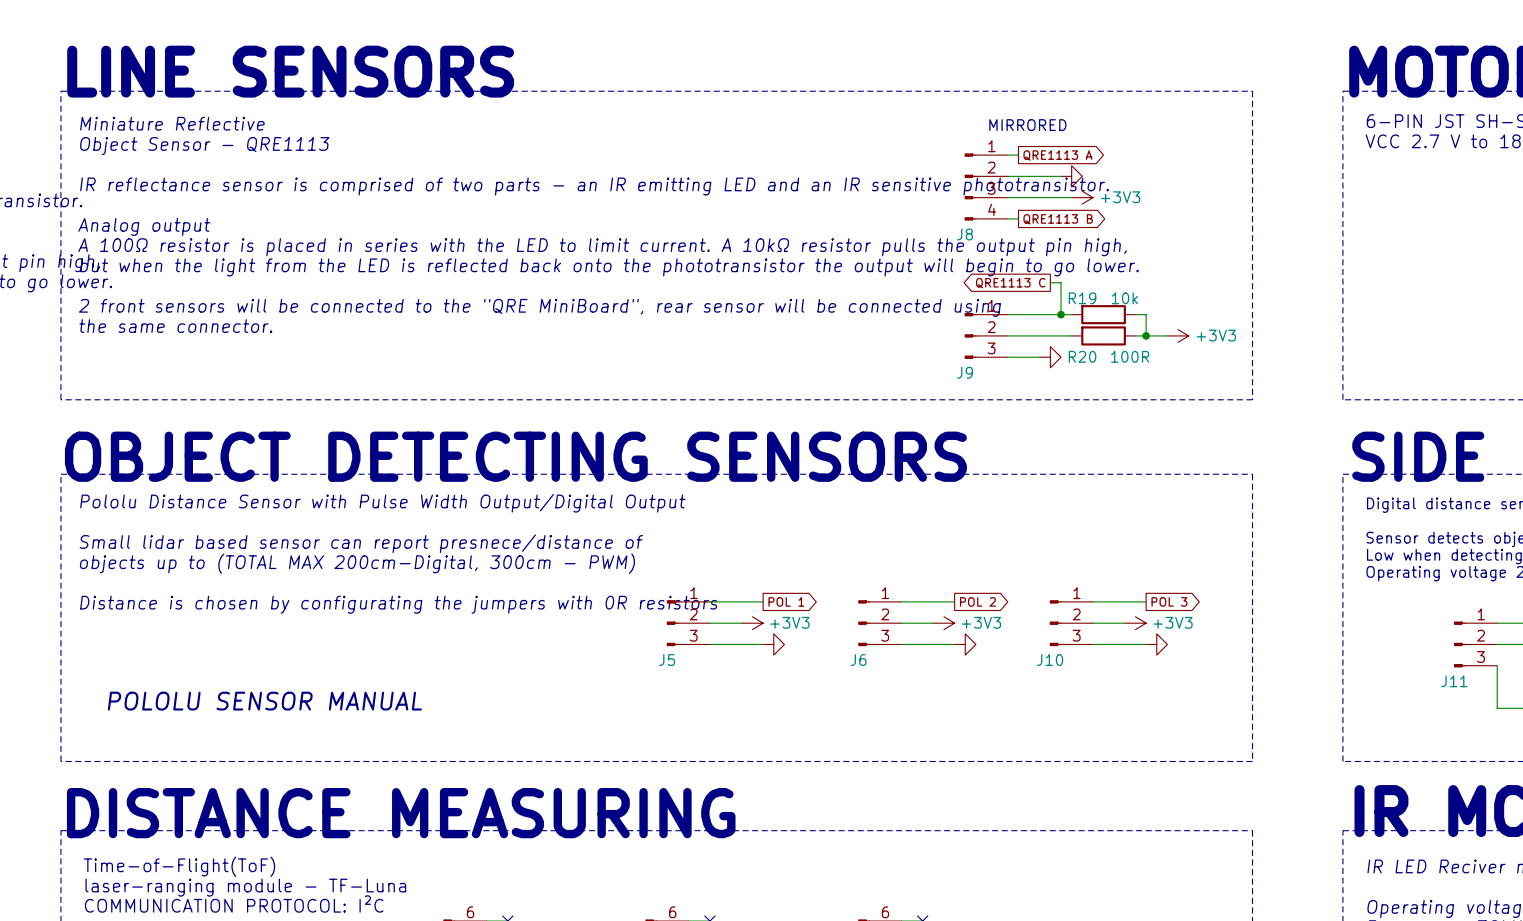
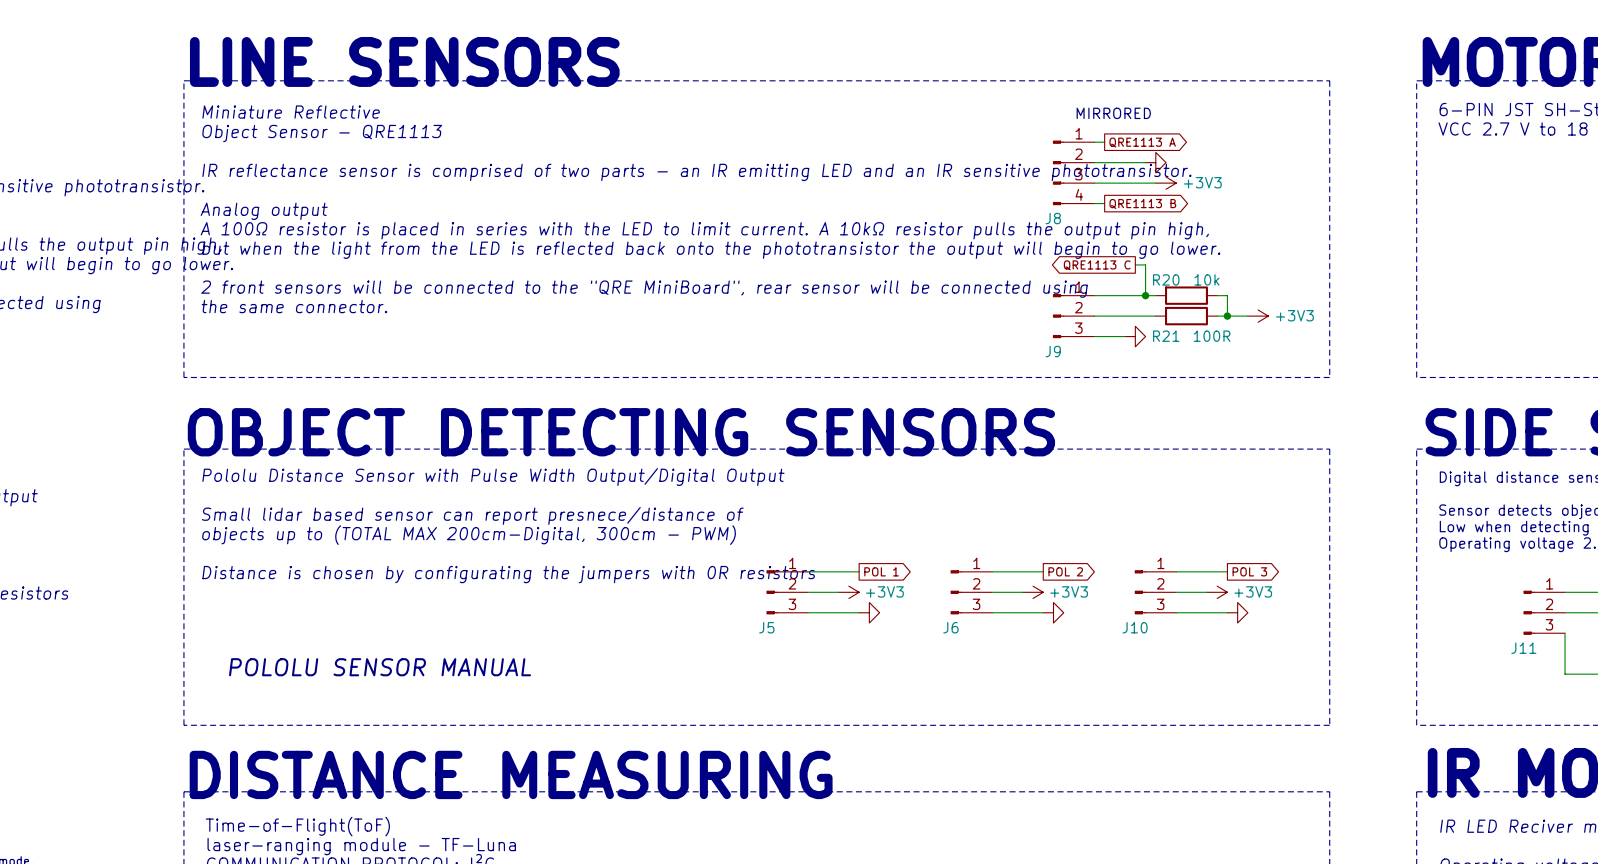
R19 name: R19 (1082, 298) -> R20 (1166, 279)
R20 name: R20 (1082, 356) -> R21 (1166, 336)

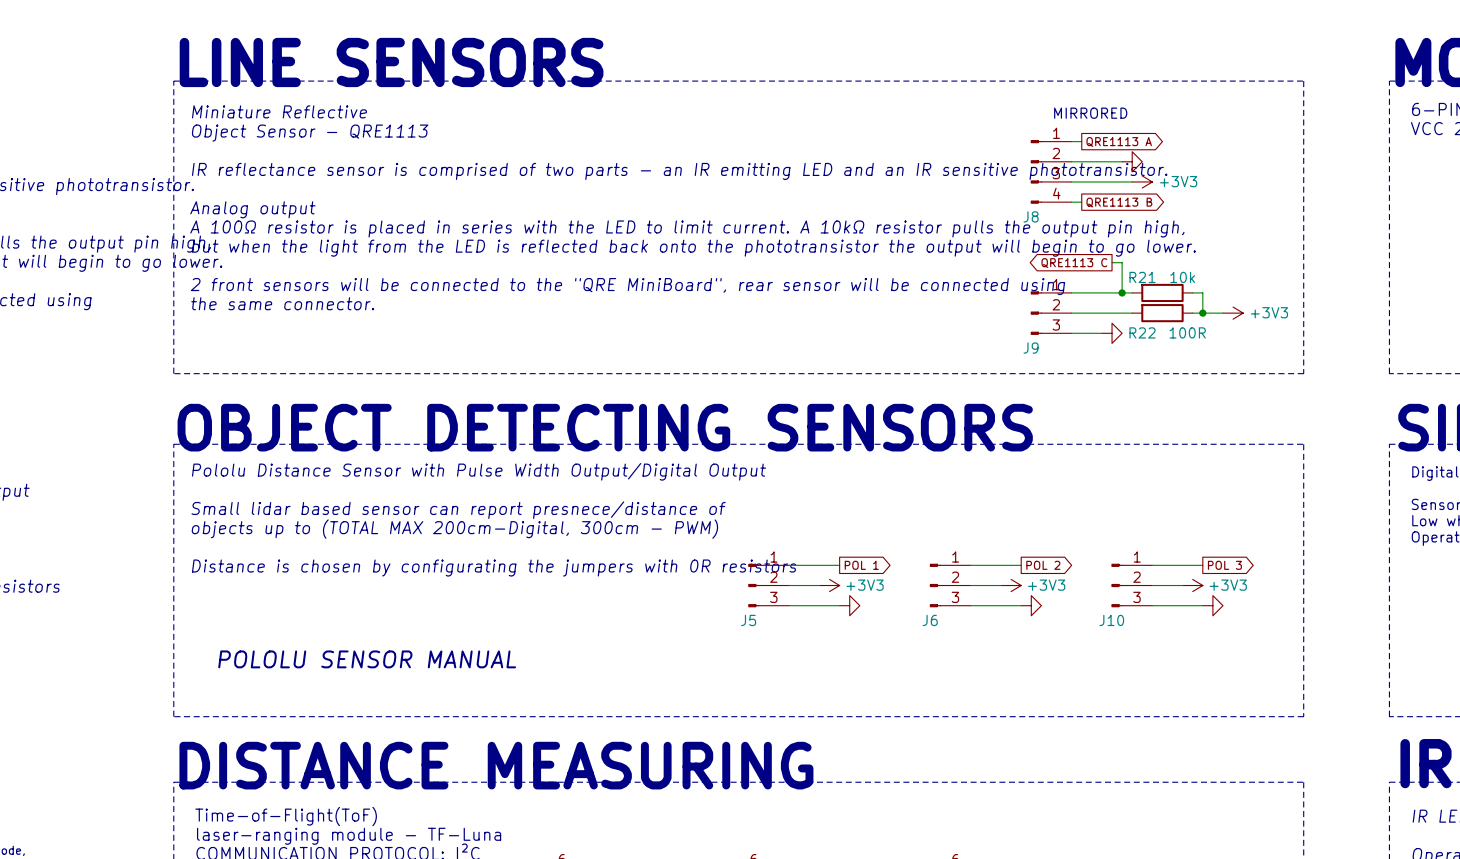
R20 name: R20 (1166, 279) -> R21 (1142, 277)
R21 name: R21 (1166, 336) -> R22 (1142, 332)

